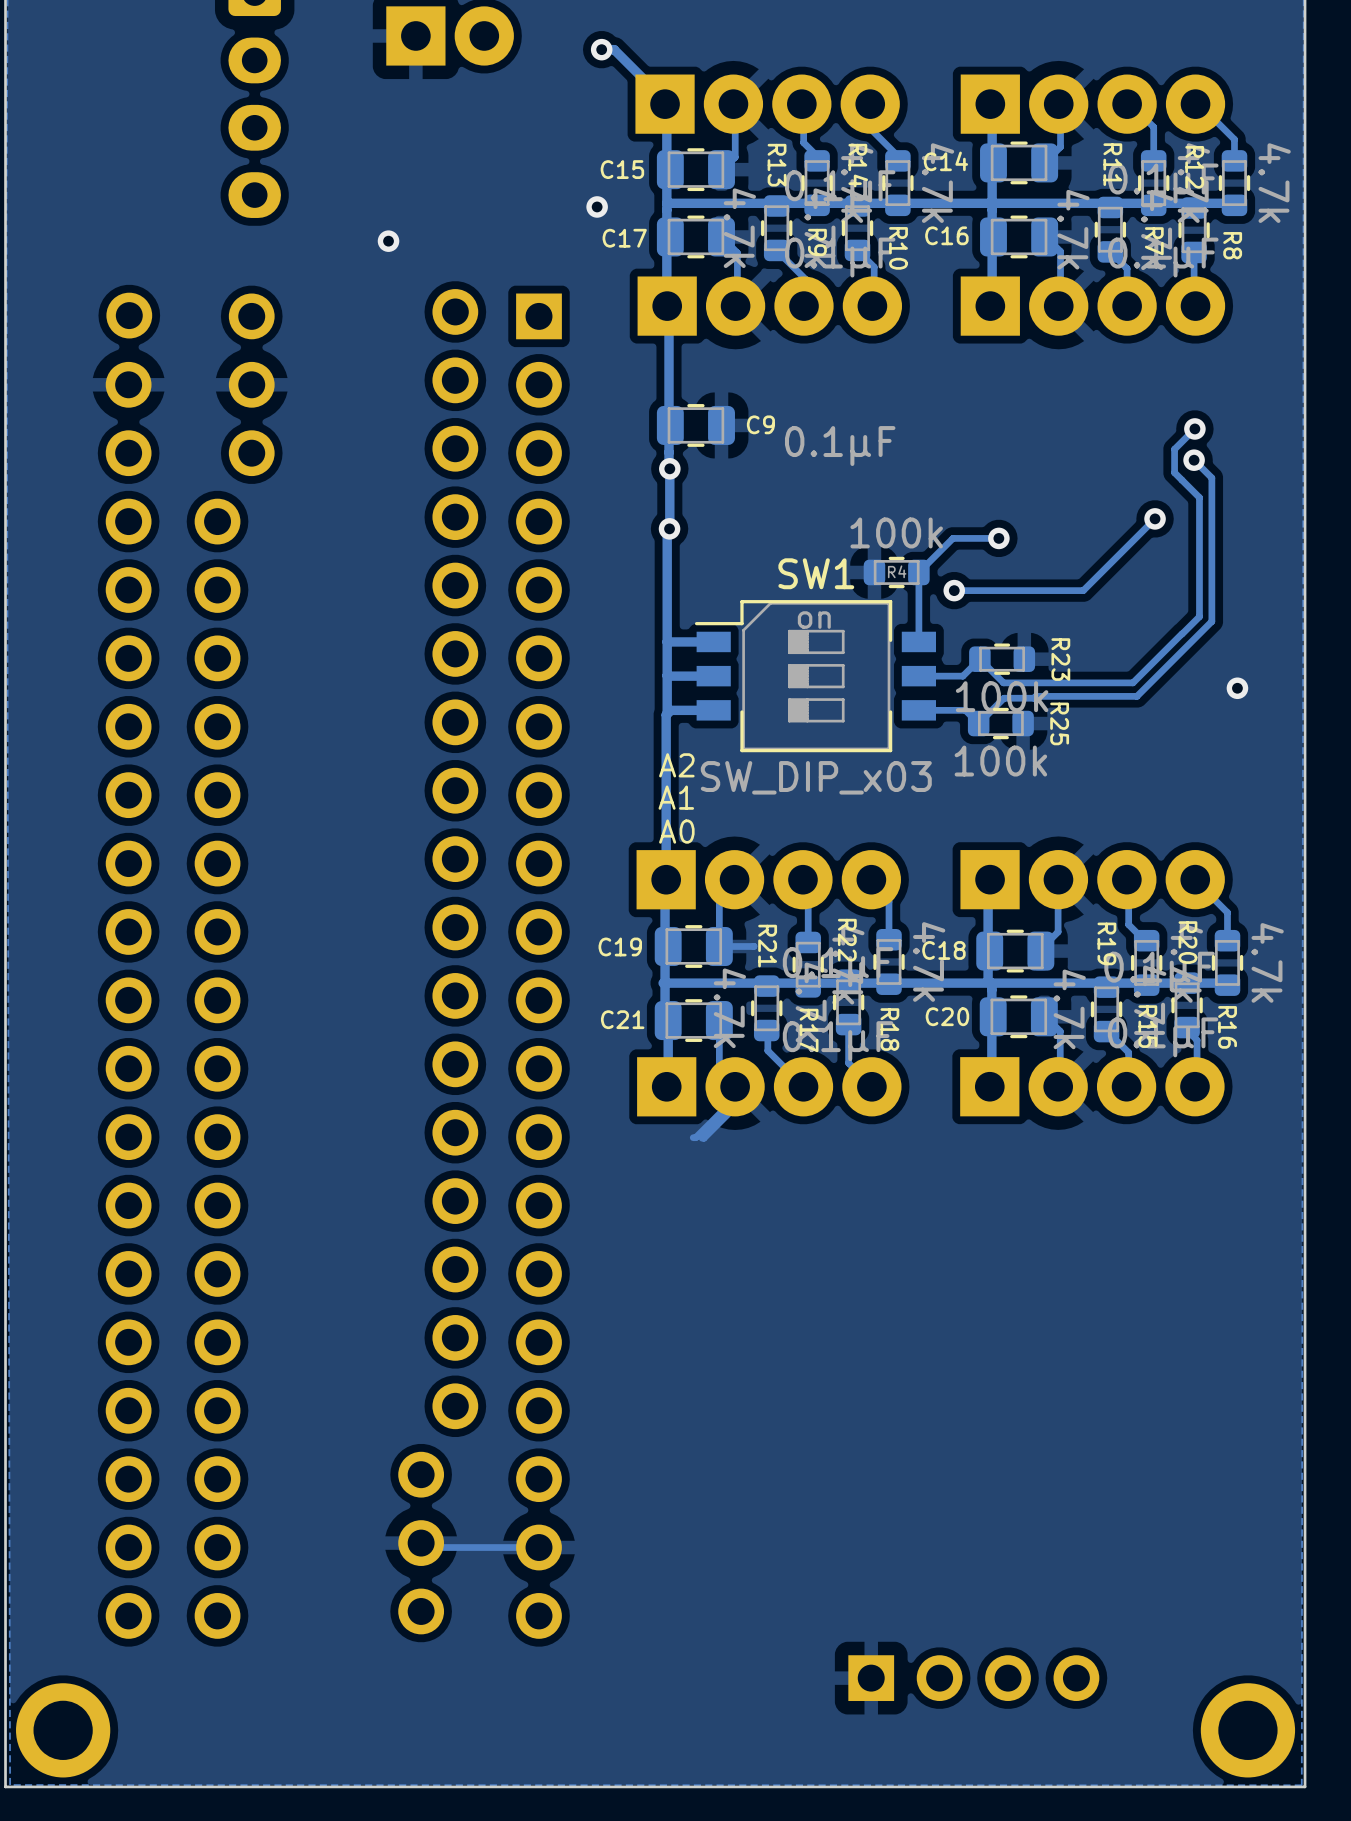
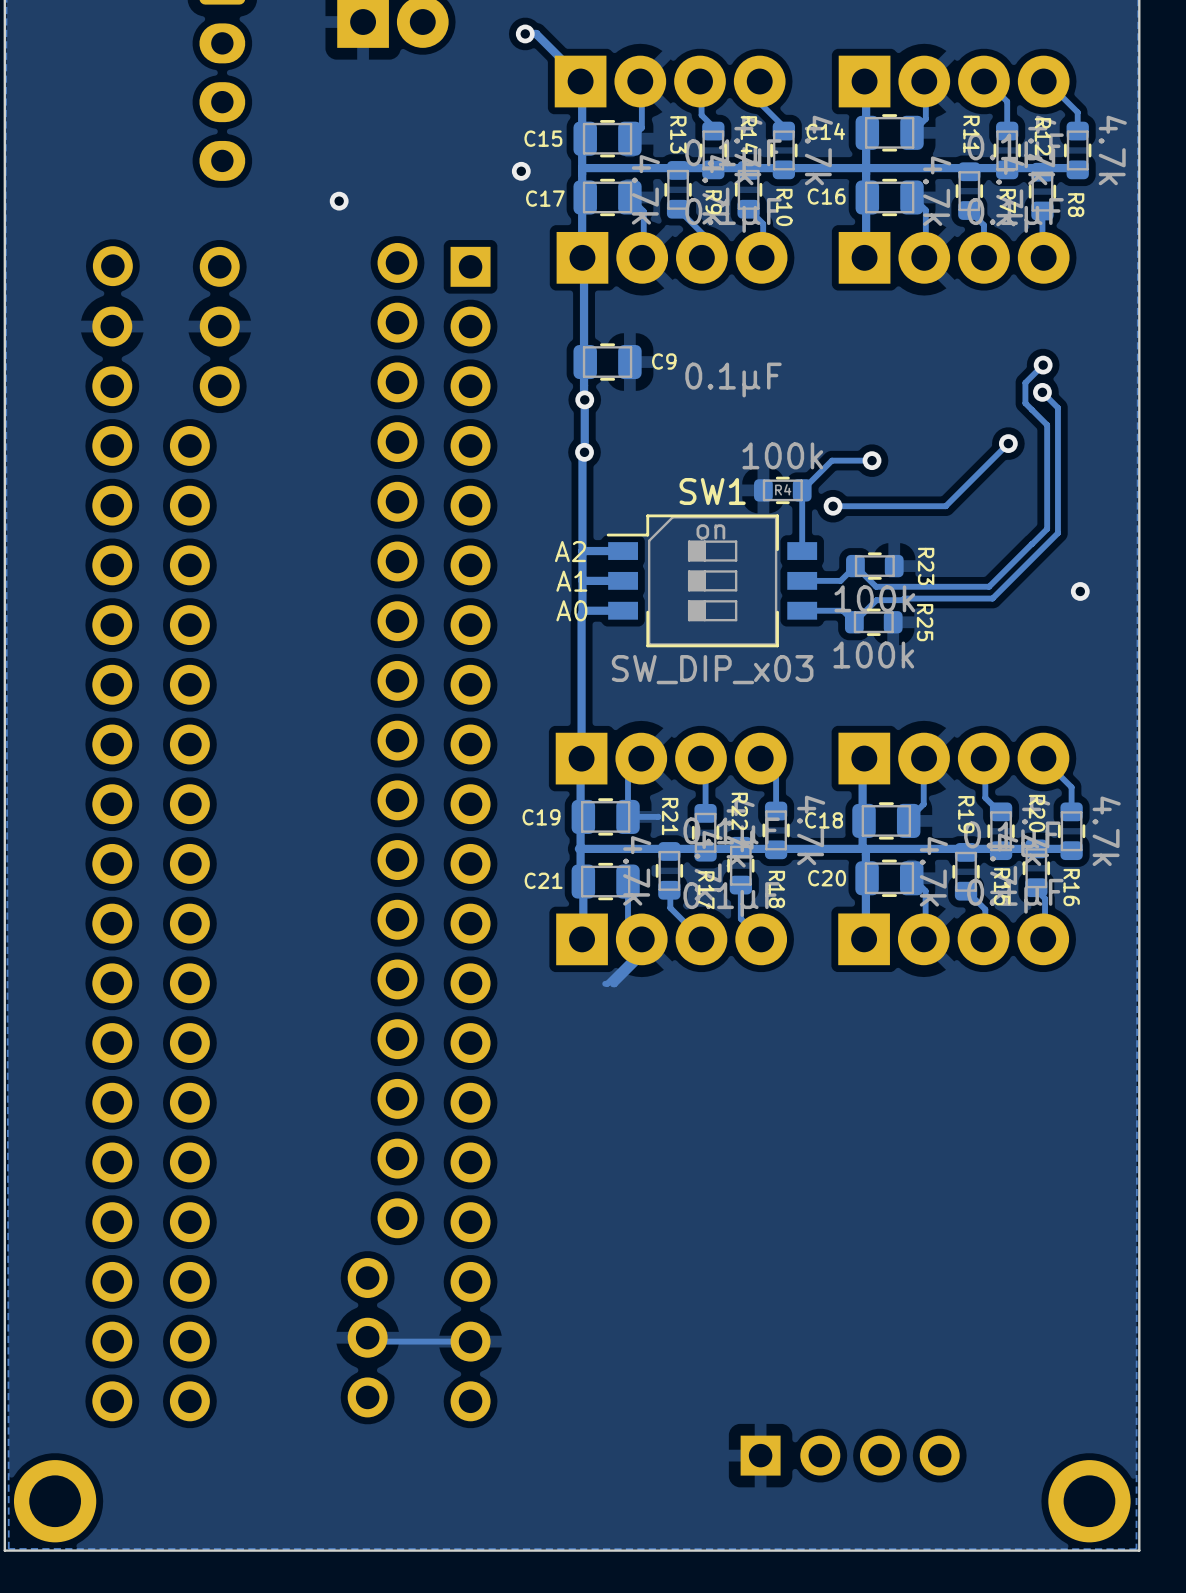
text position: A2 (676, 765) -> A2 (570, 551)
text position: A1 (676, 797) -> A1 (571, 581)
text position: A0 (676, 831) -> A0 (571, 610)

